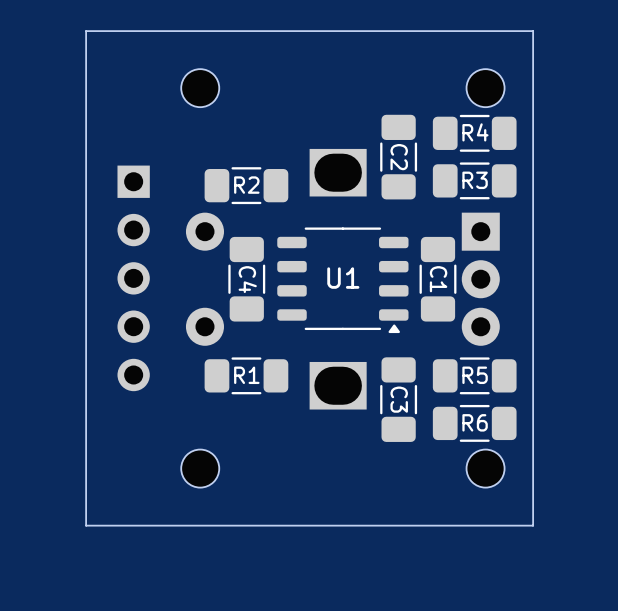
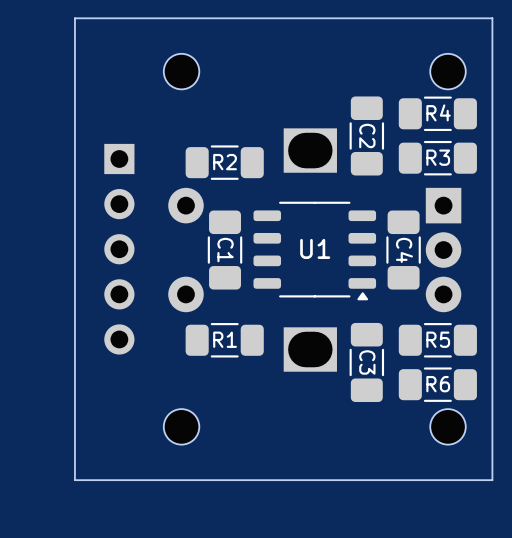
C4 name: C4 (247, 279) -> C1 (225, 250)
C1 name: C1 (438, 279) -> C4 (404, 250)

